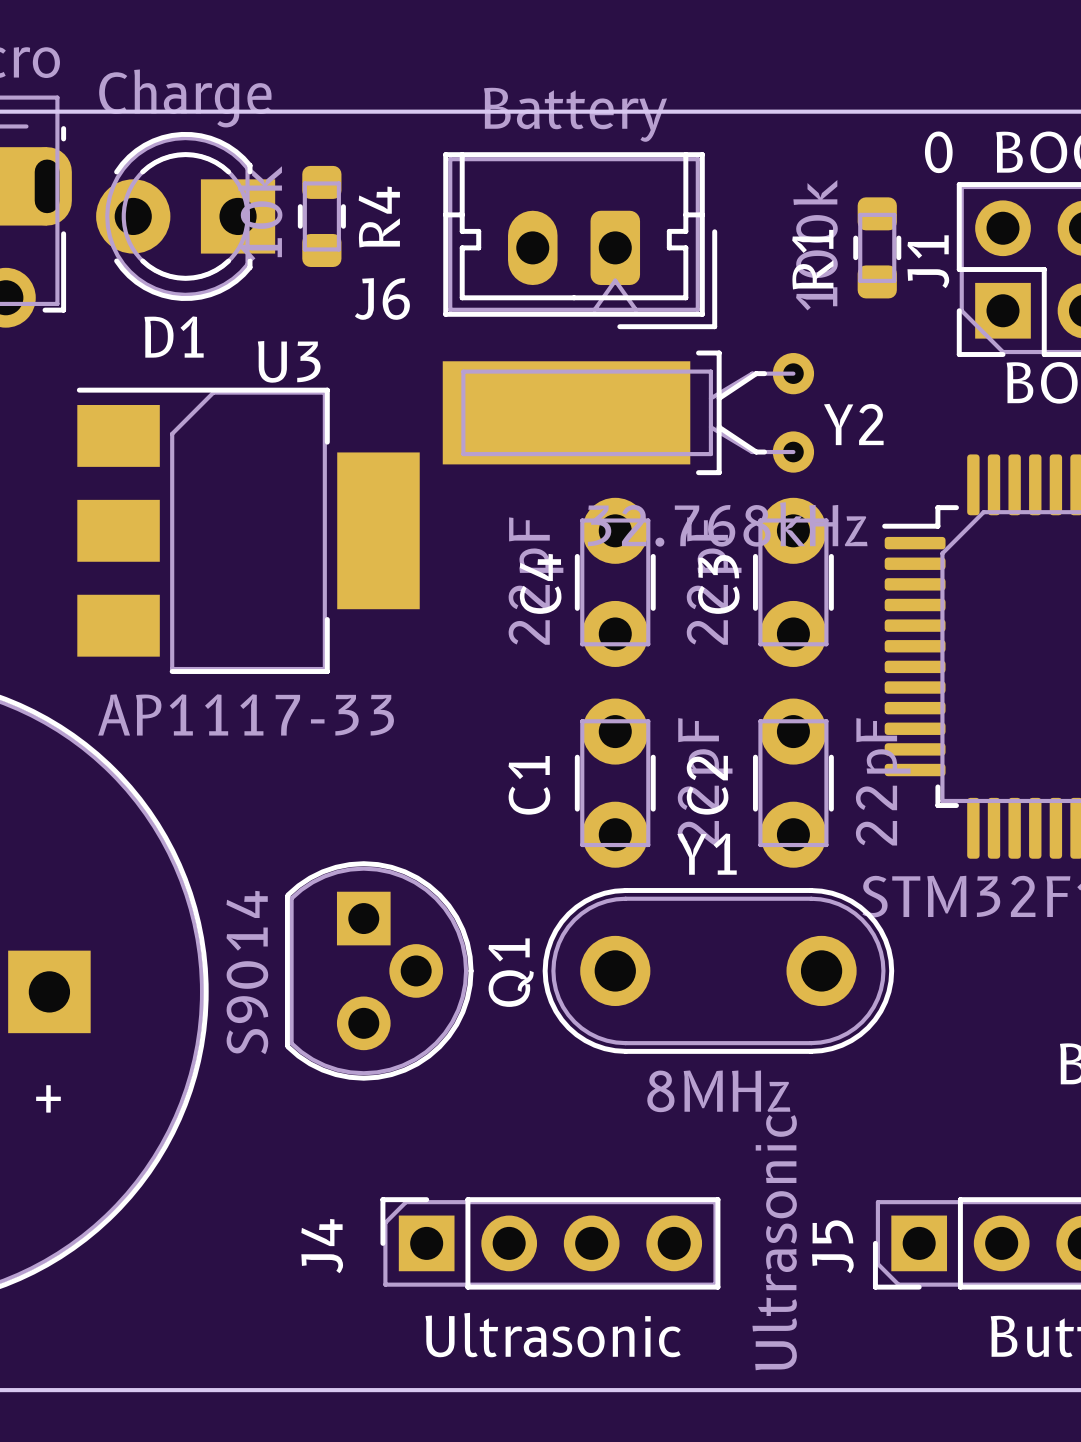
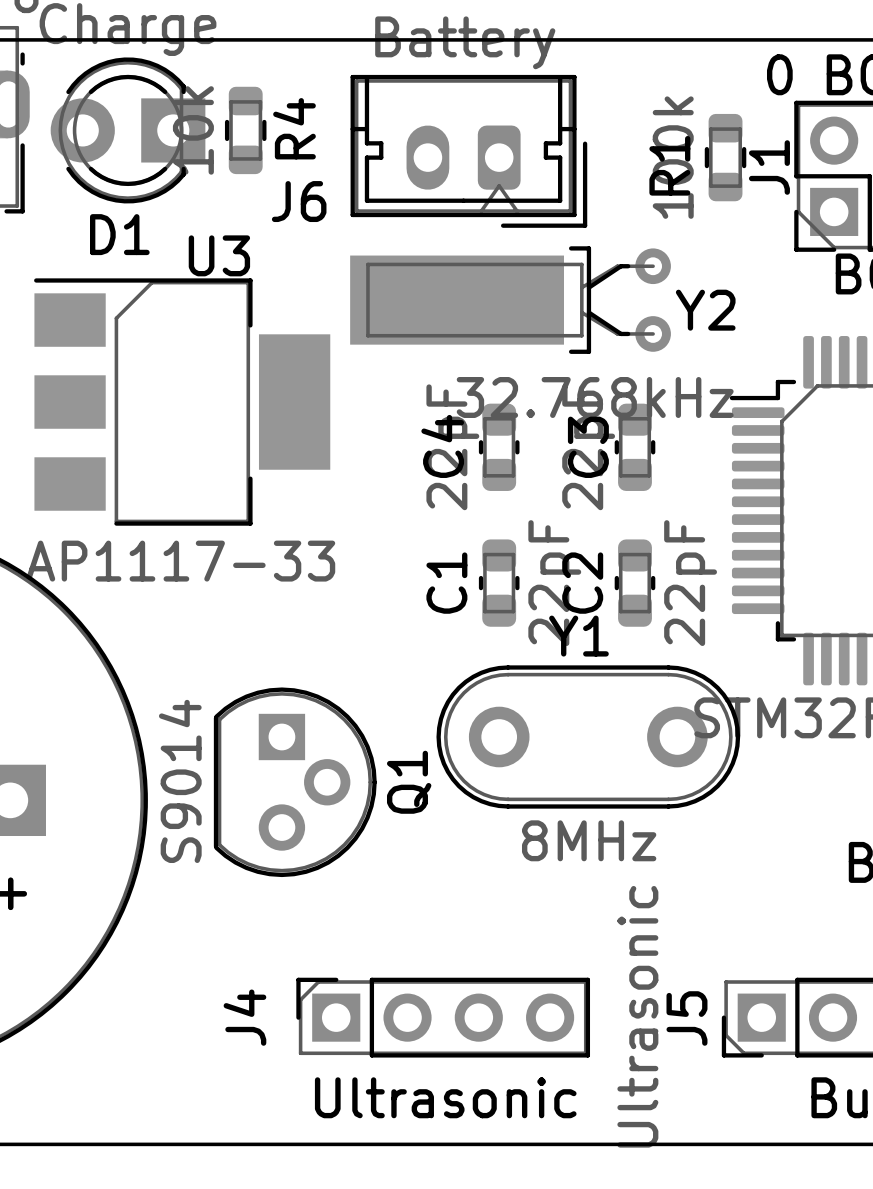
C4 footprint: [574, 497, 656, 667] -> [478, 403, 520, 491]
C3 footprint: [752, 497, 834, 667] -> [614, 403, 656, 491]
C1 footprint: [574, 698, 656, 868] -> [478, 539, 520, 627]
C2 footprint: [752, 698, 834, 868] -> [614, 539, 656, 627]
Y1 position: (718, 970) -> (588, 736)

